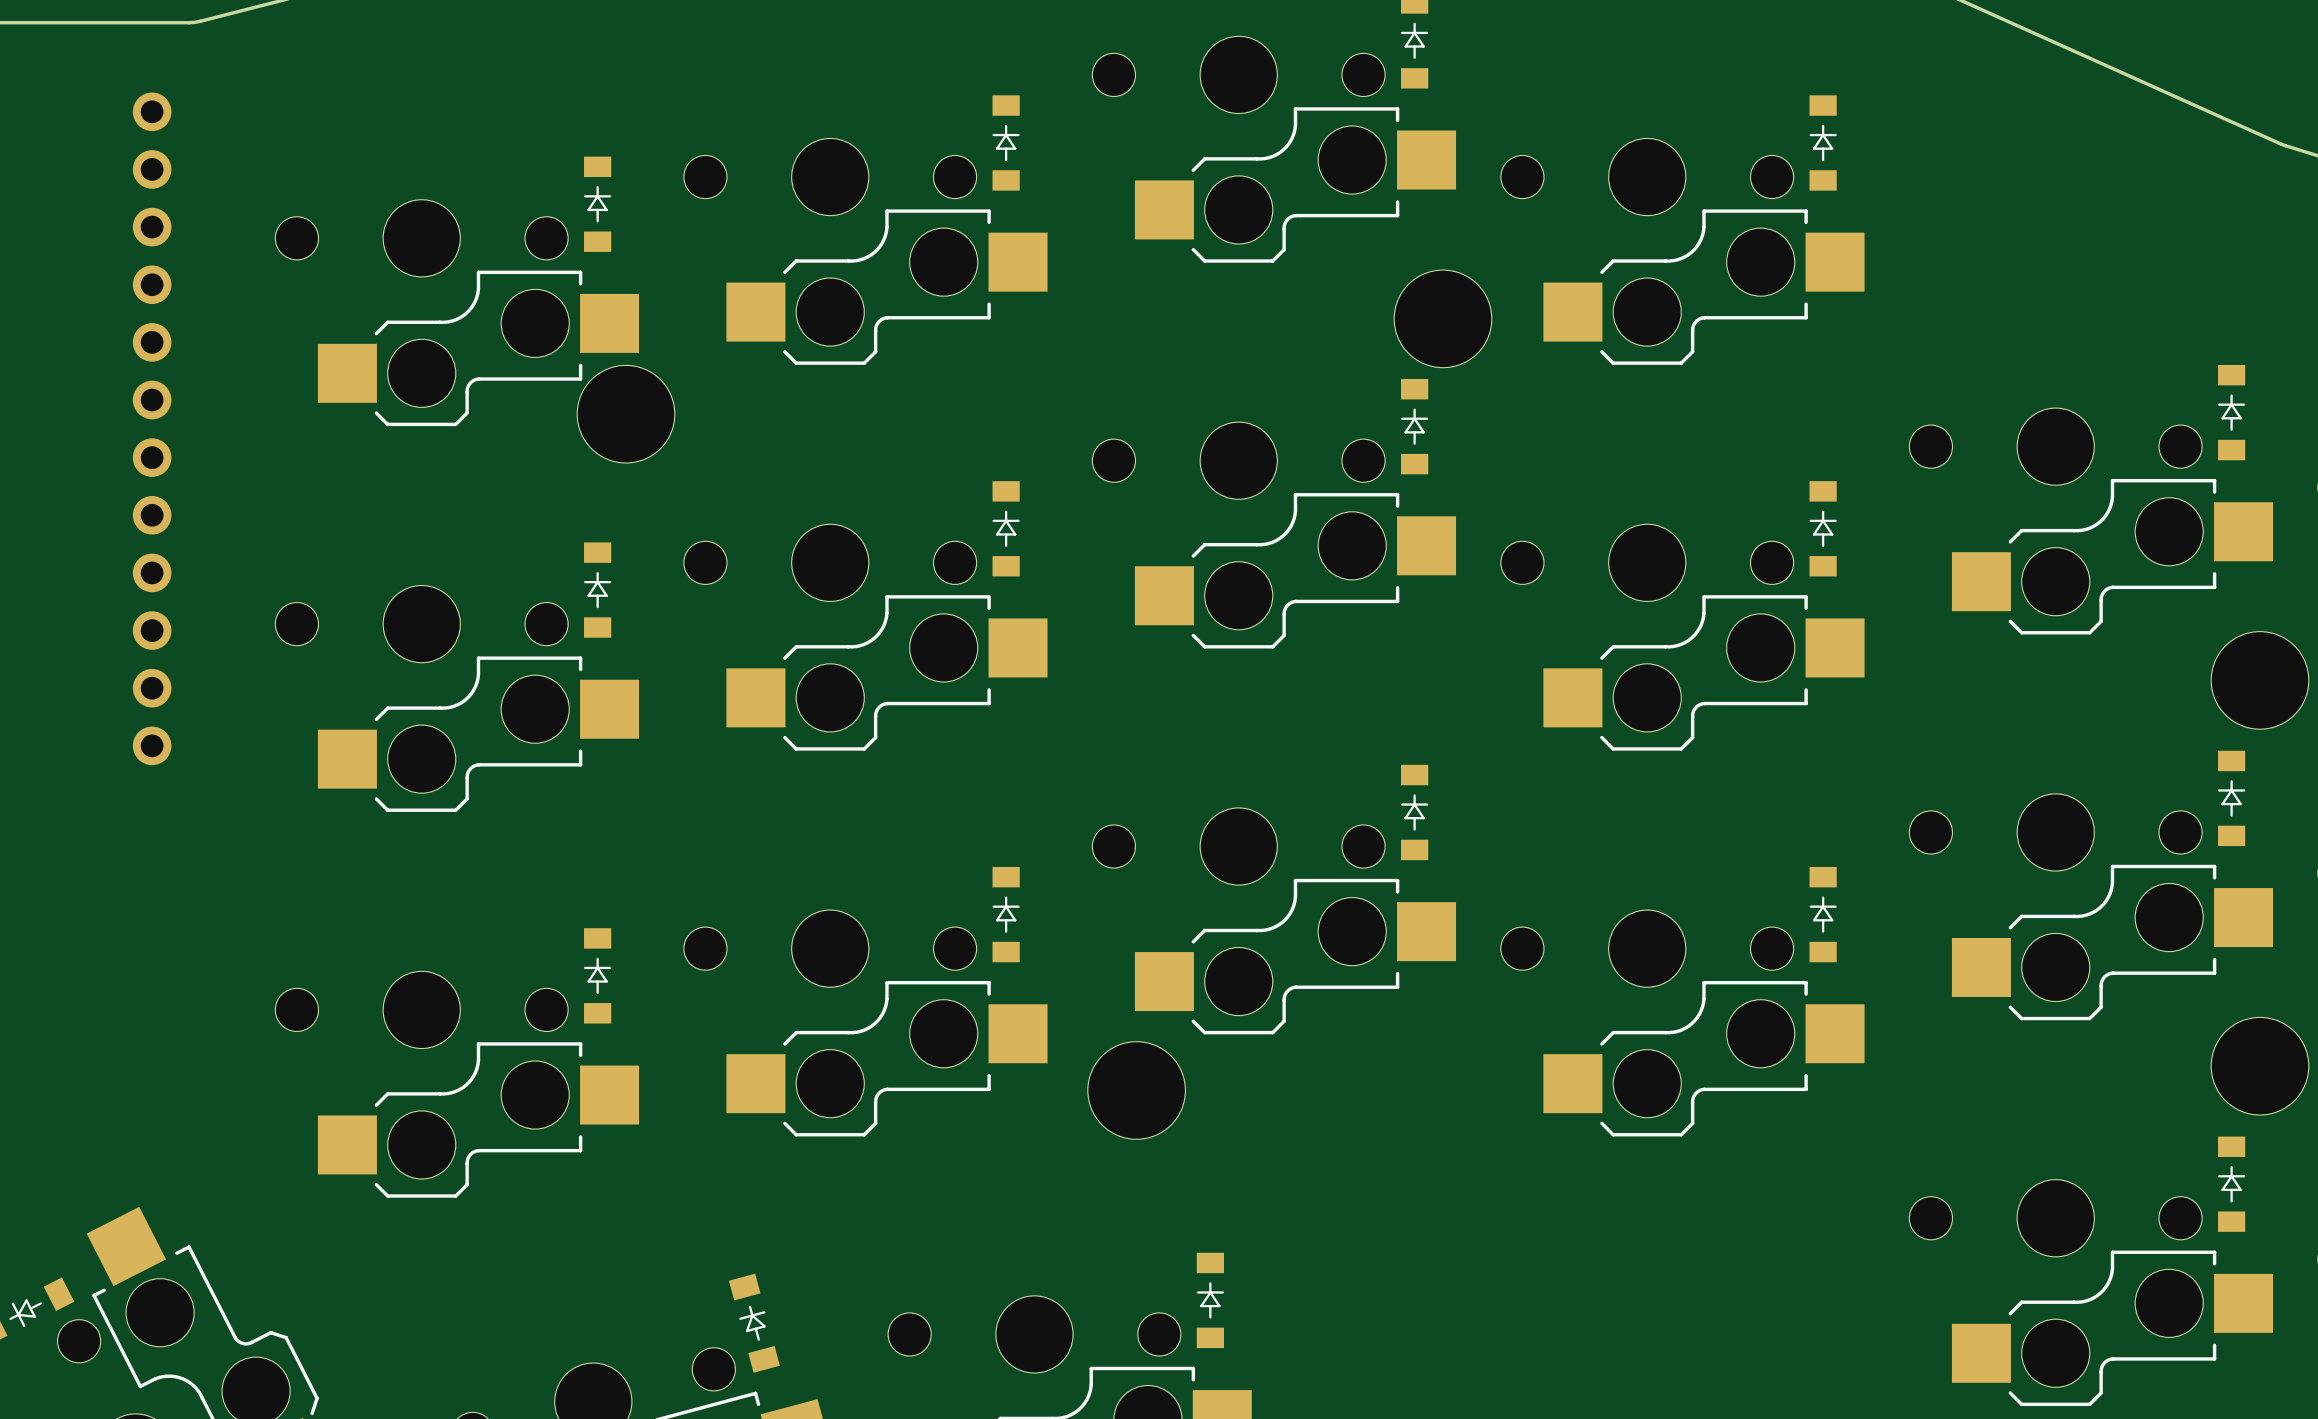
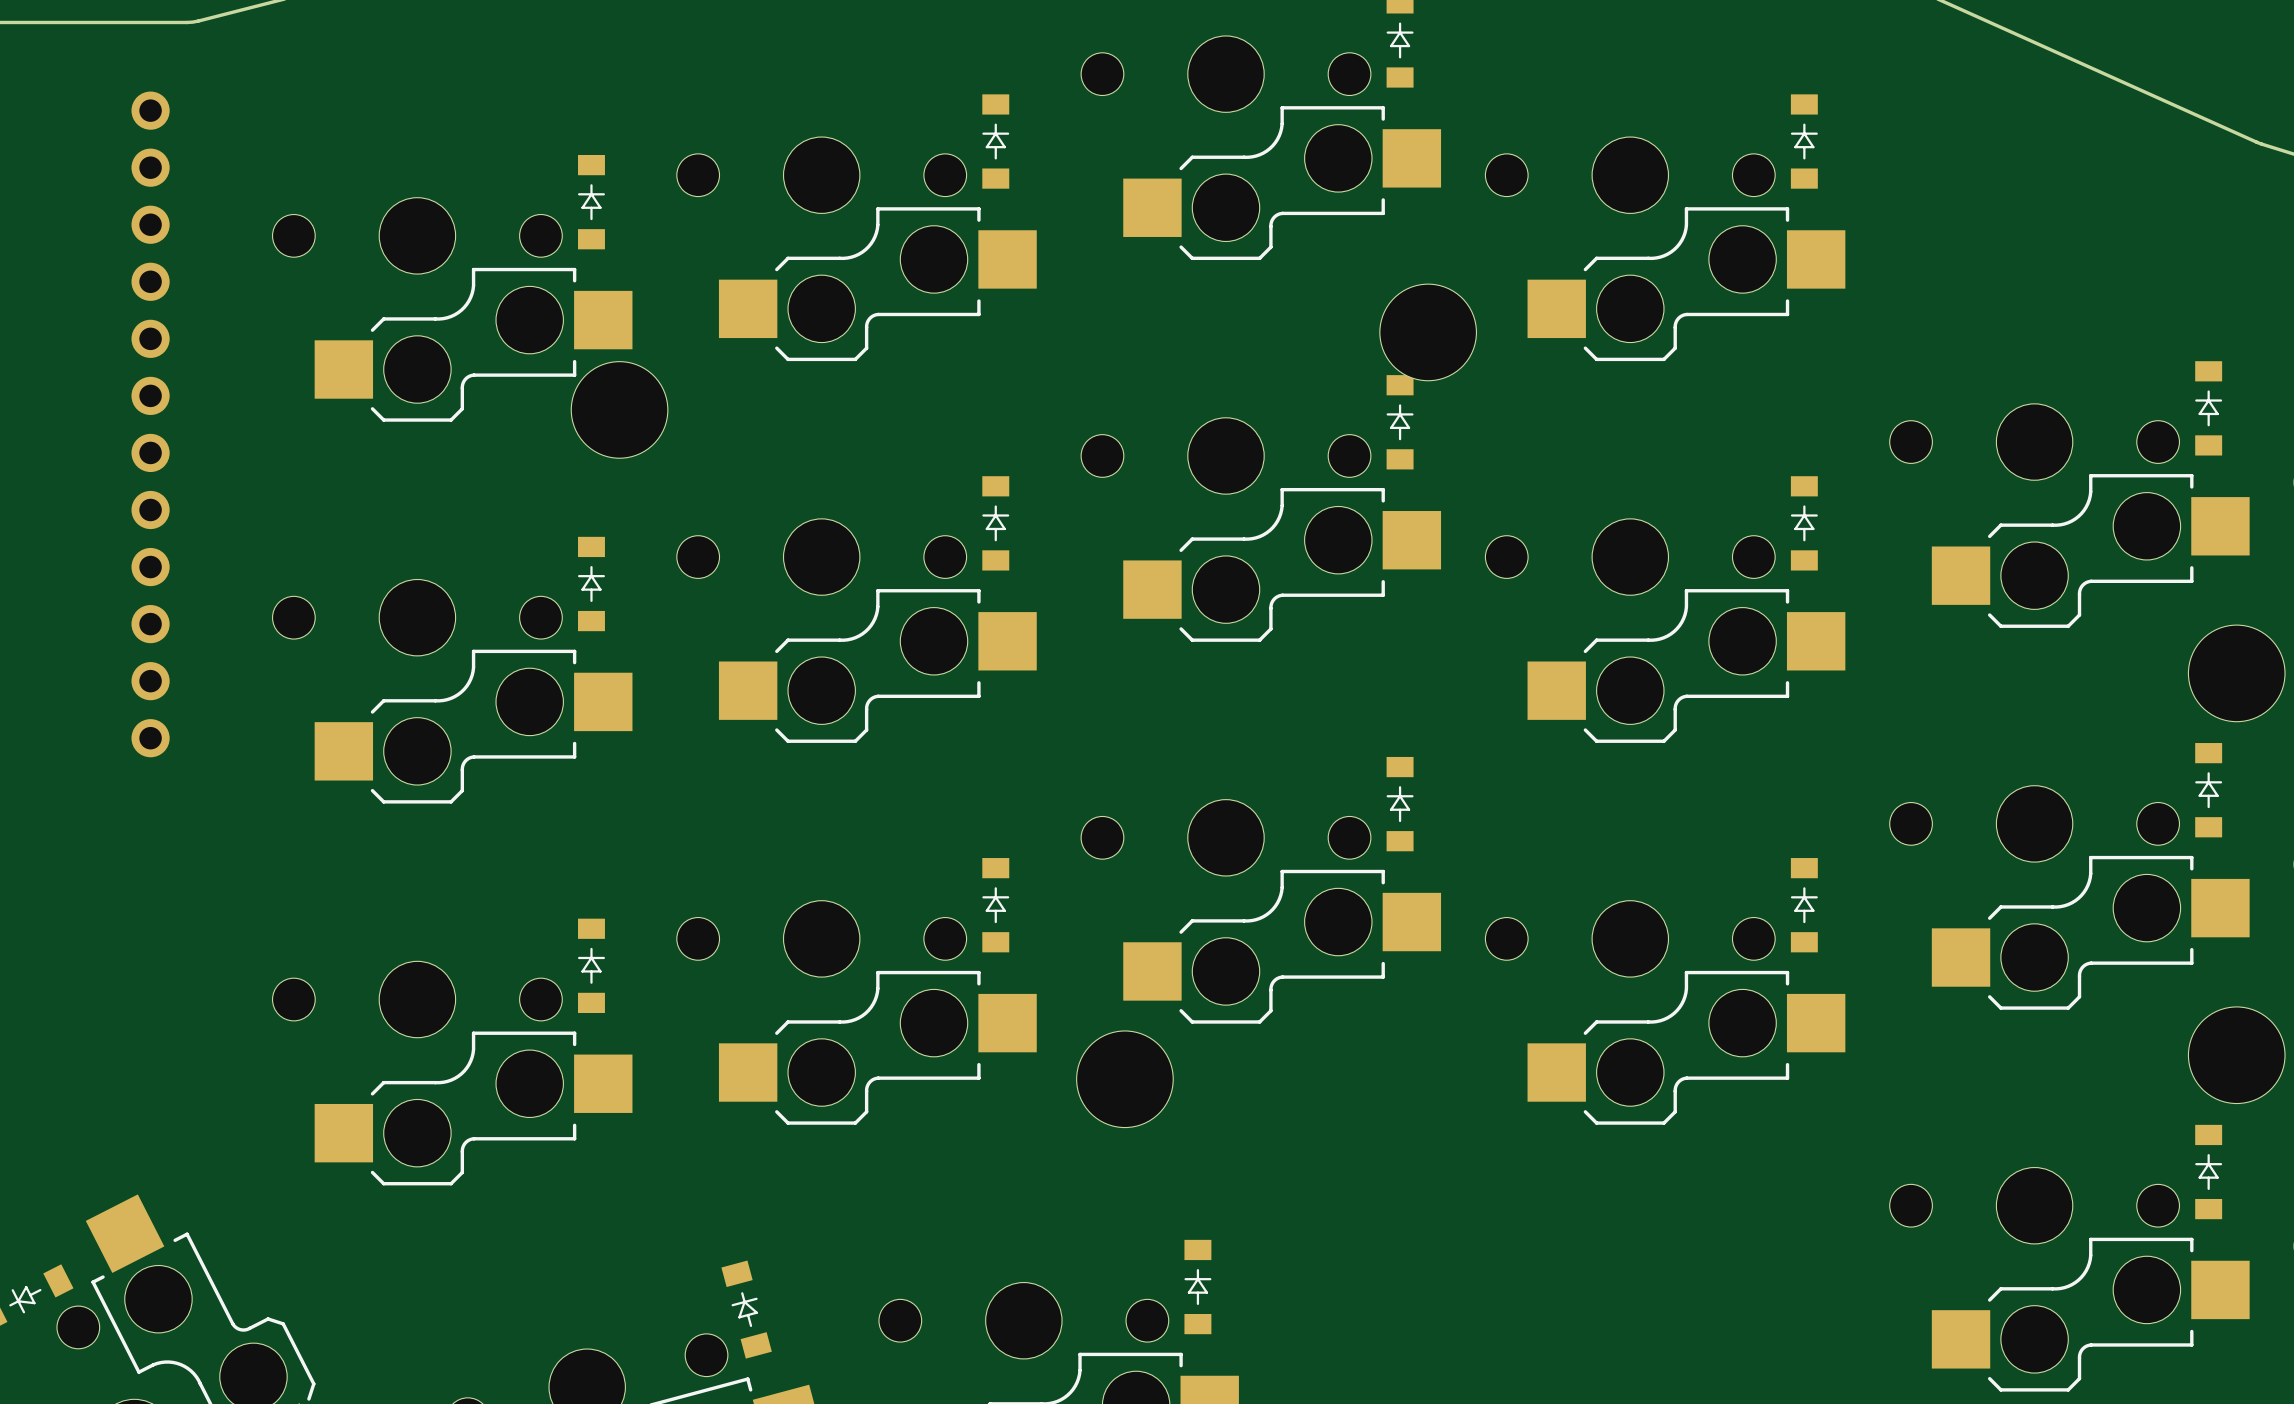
part position: (1442, 318) -> (1428, 332)

